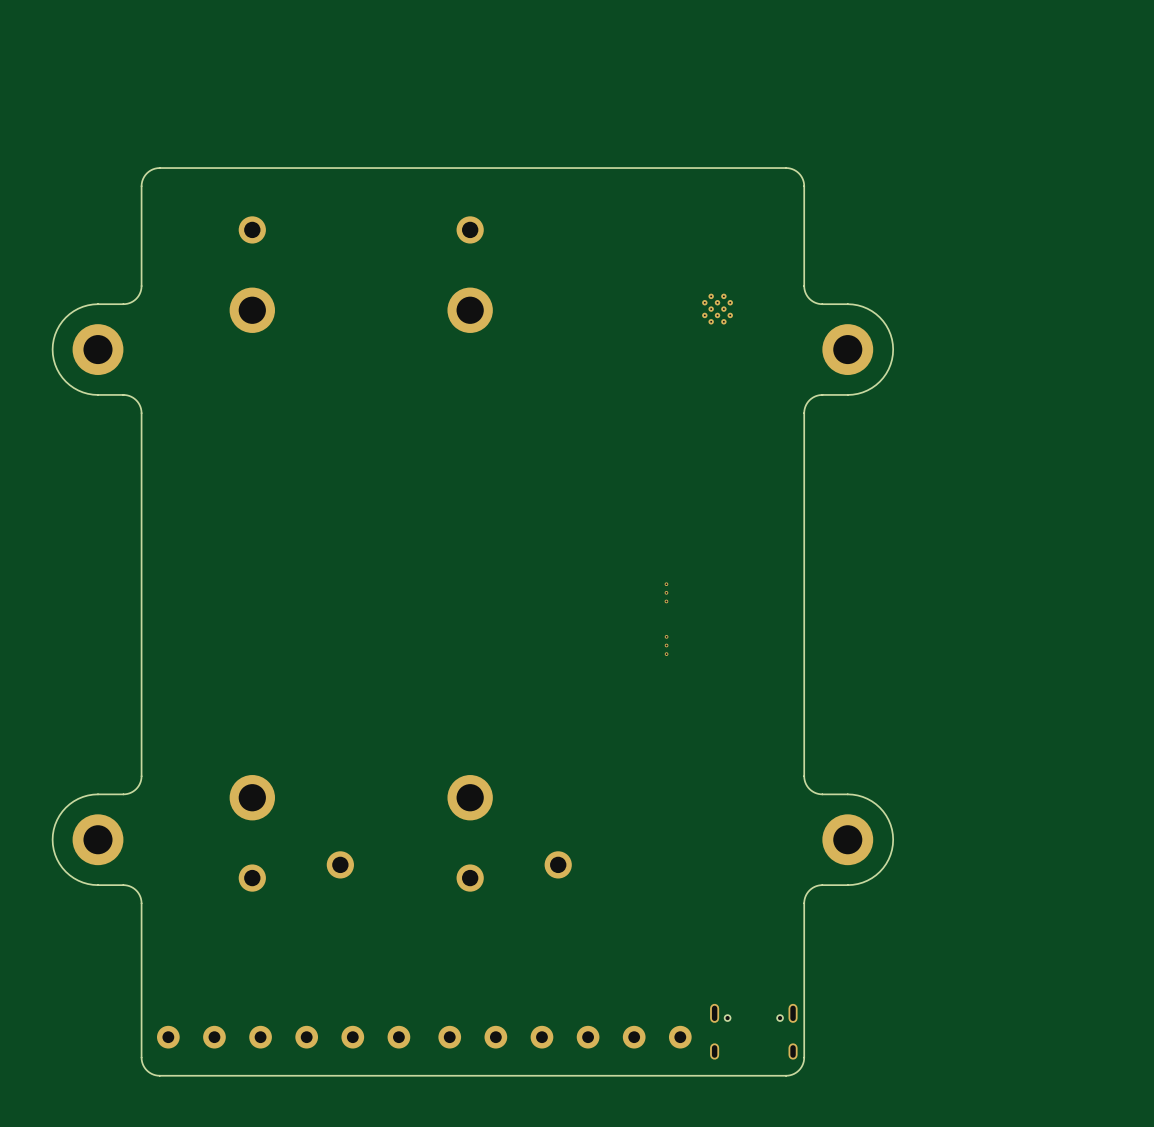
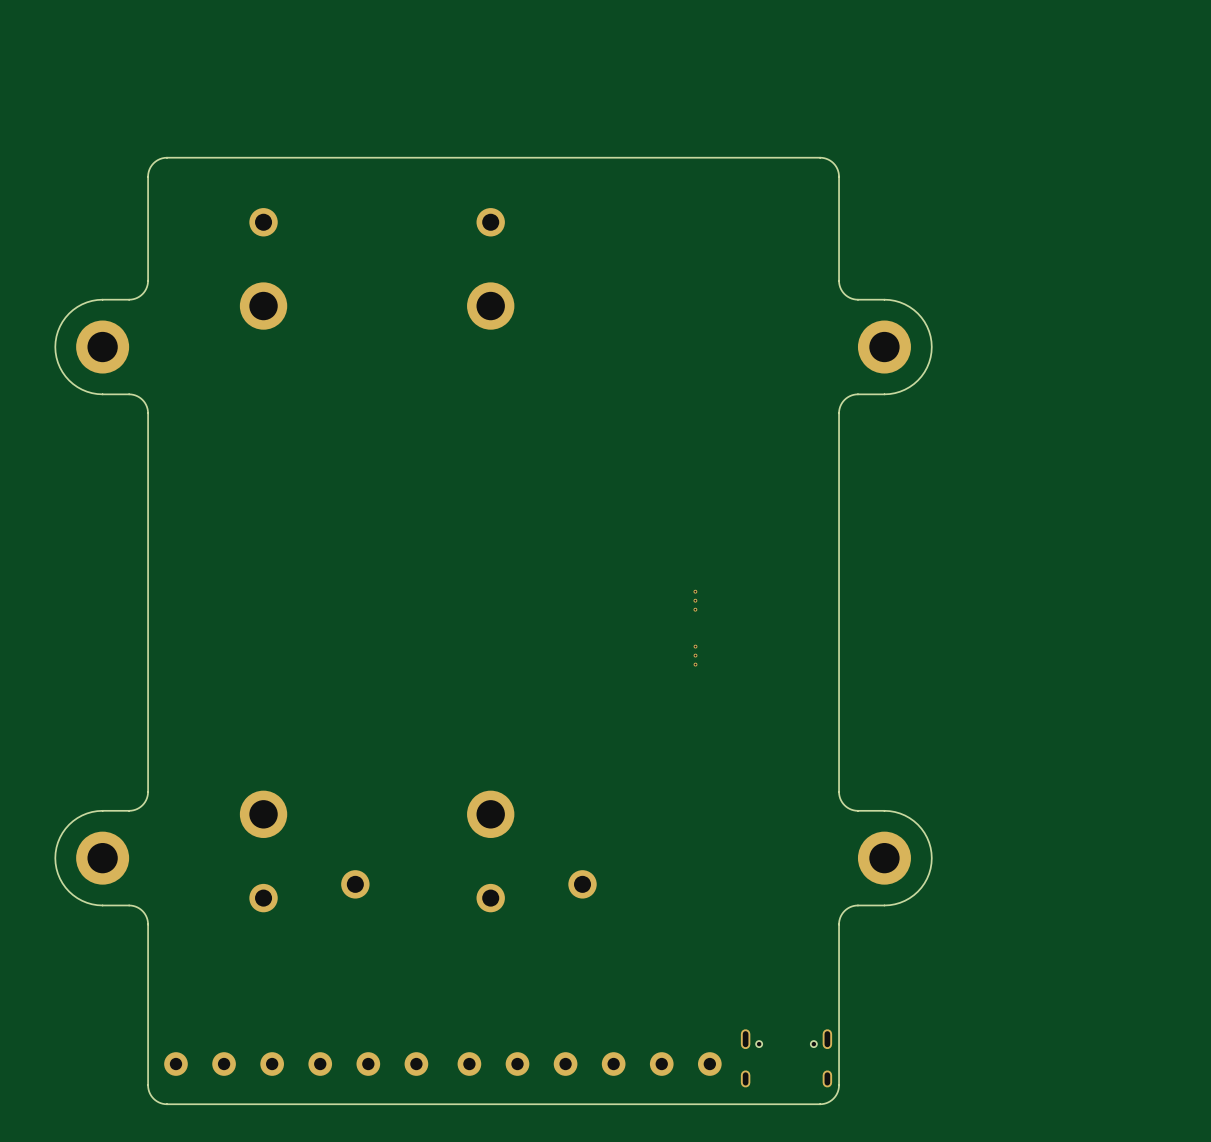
part: (717, 309) -> none

